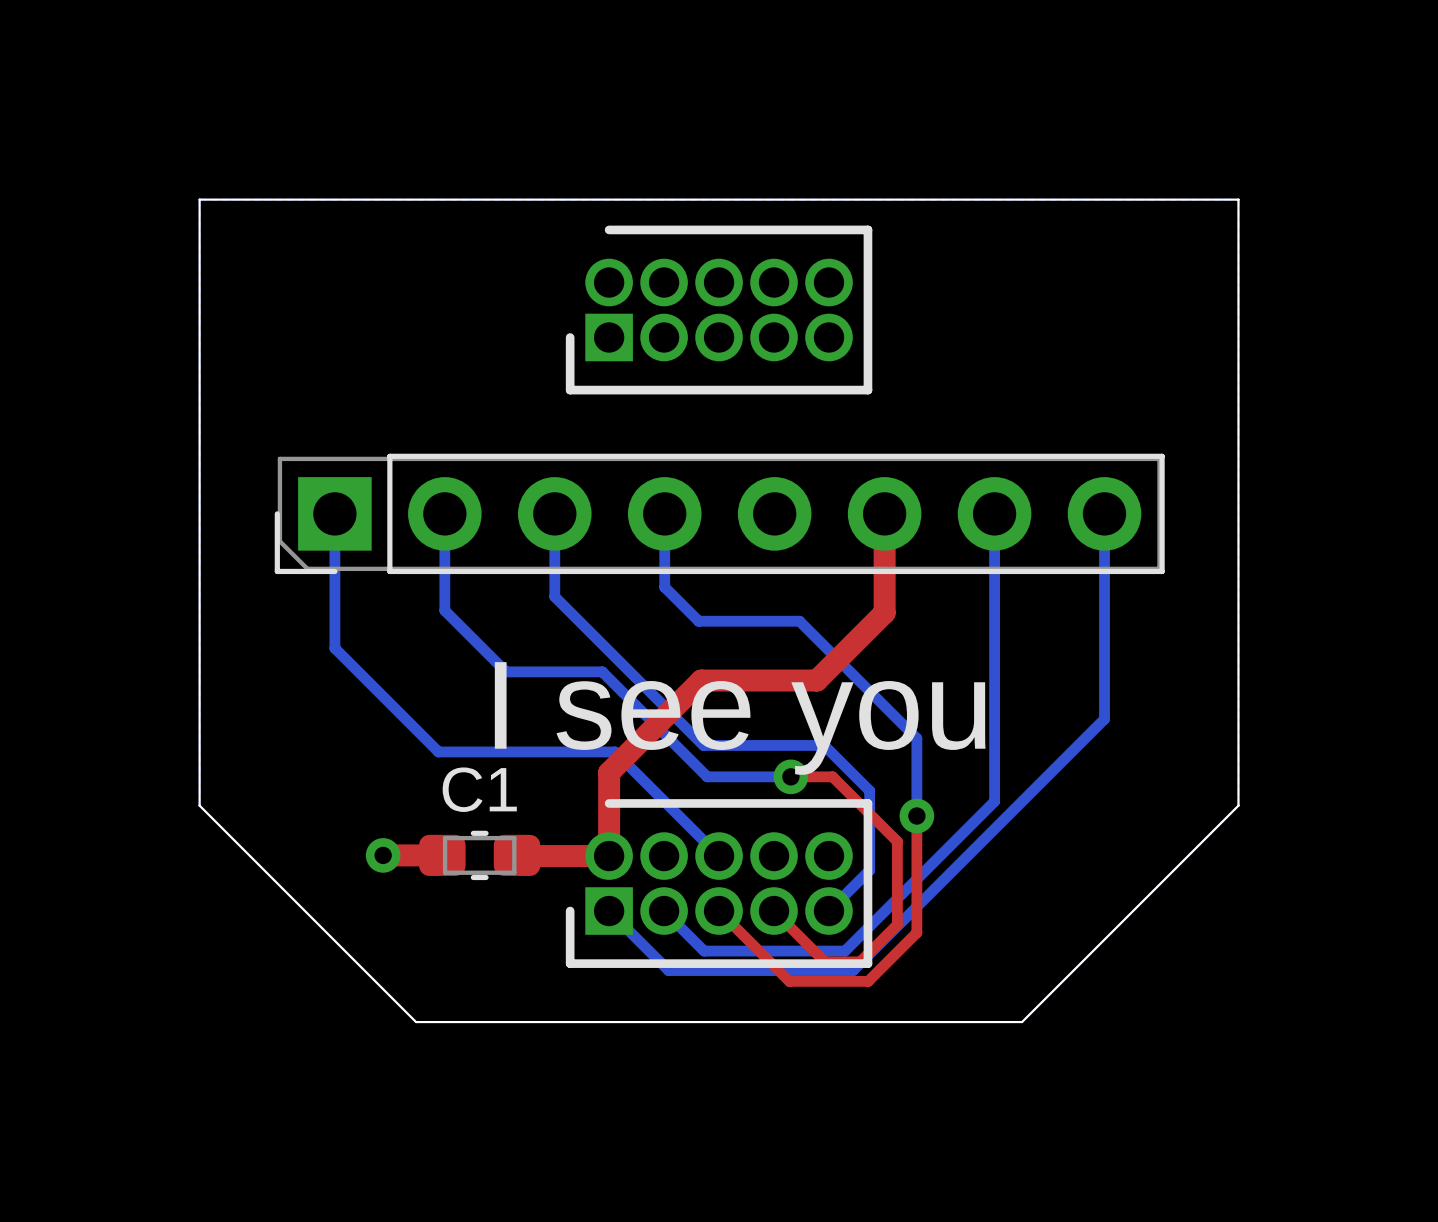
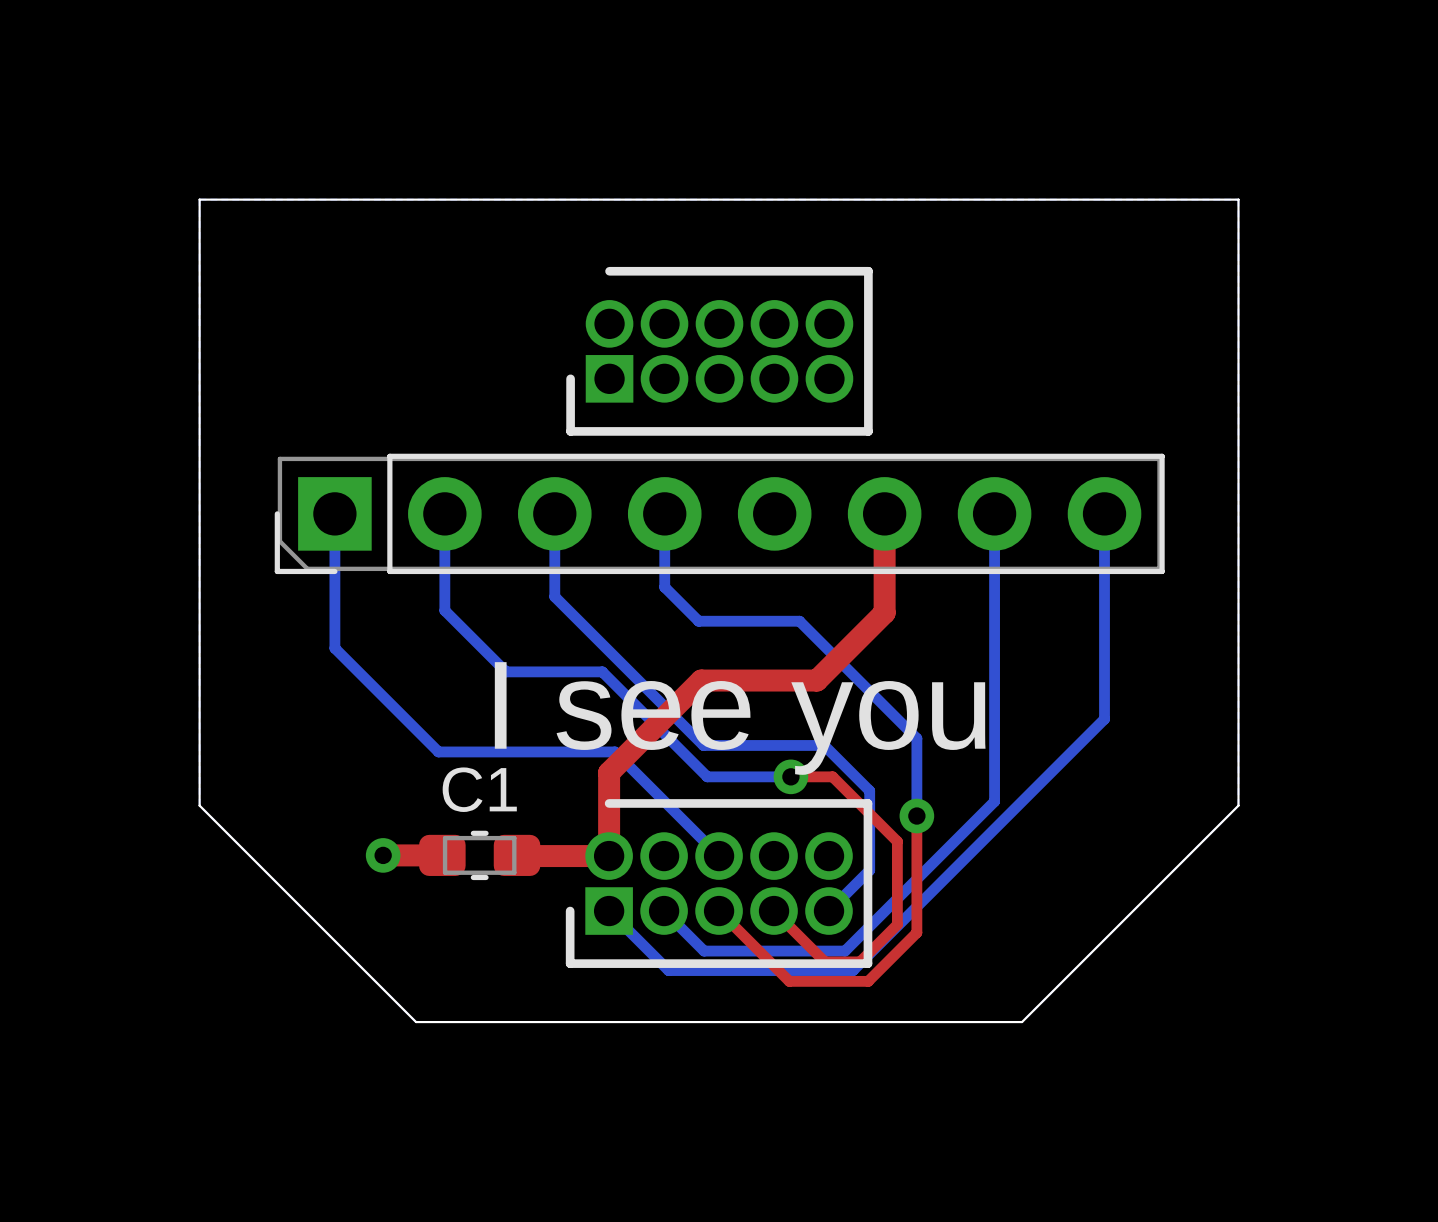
part position: (719, 310) -> (719, 351)

